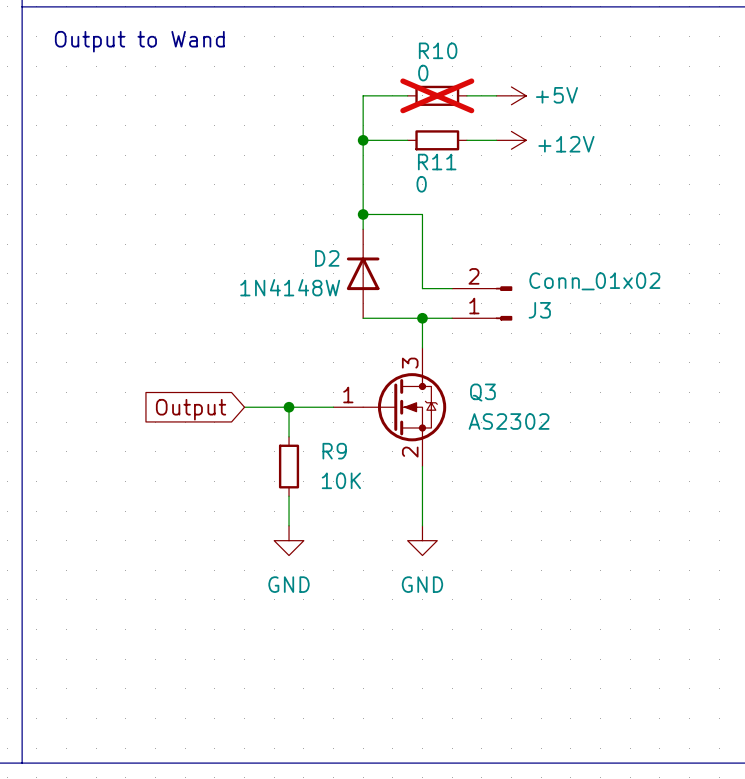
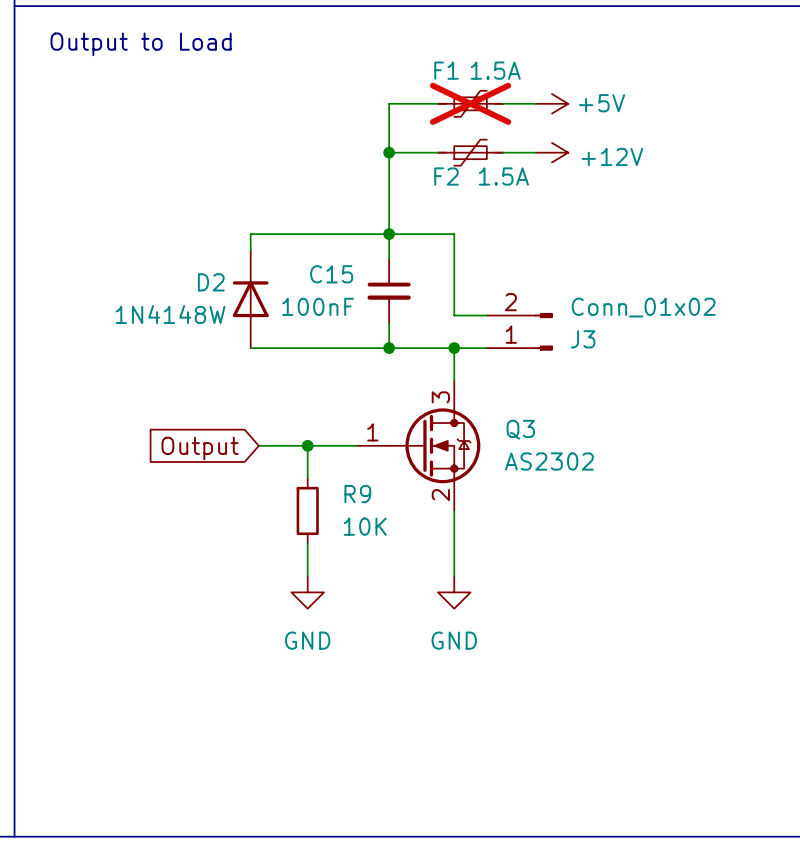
text: Output to Wand (139, 41) -> Output to Load (141, 44)
R10: 0 (437, 95) -> none
F1: none -> 1.5A (470, 103)
R11: 0 (437, 140) -> none
F2: none -> 1.5A (470, 152)
wire: none -> (389, 234) (250, 234) (250, 250)
C15: none -> 100nF (389, 291)
D2 position: (363, 273) -> (250, 299)
wire: none -> (389, 323) (389, 348) (250, 348)
junction: none -> (389, 348)

